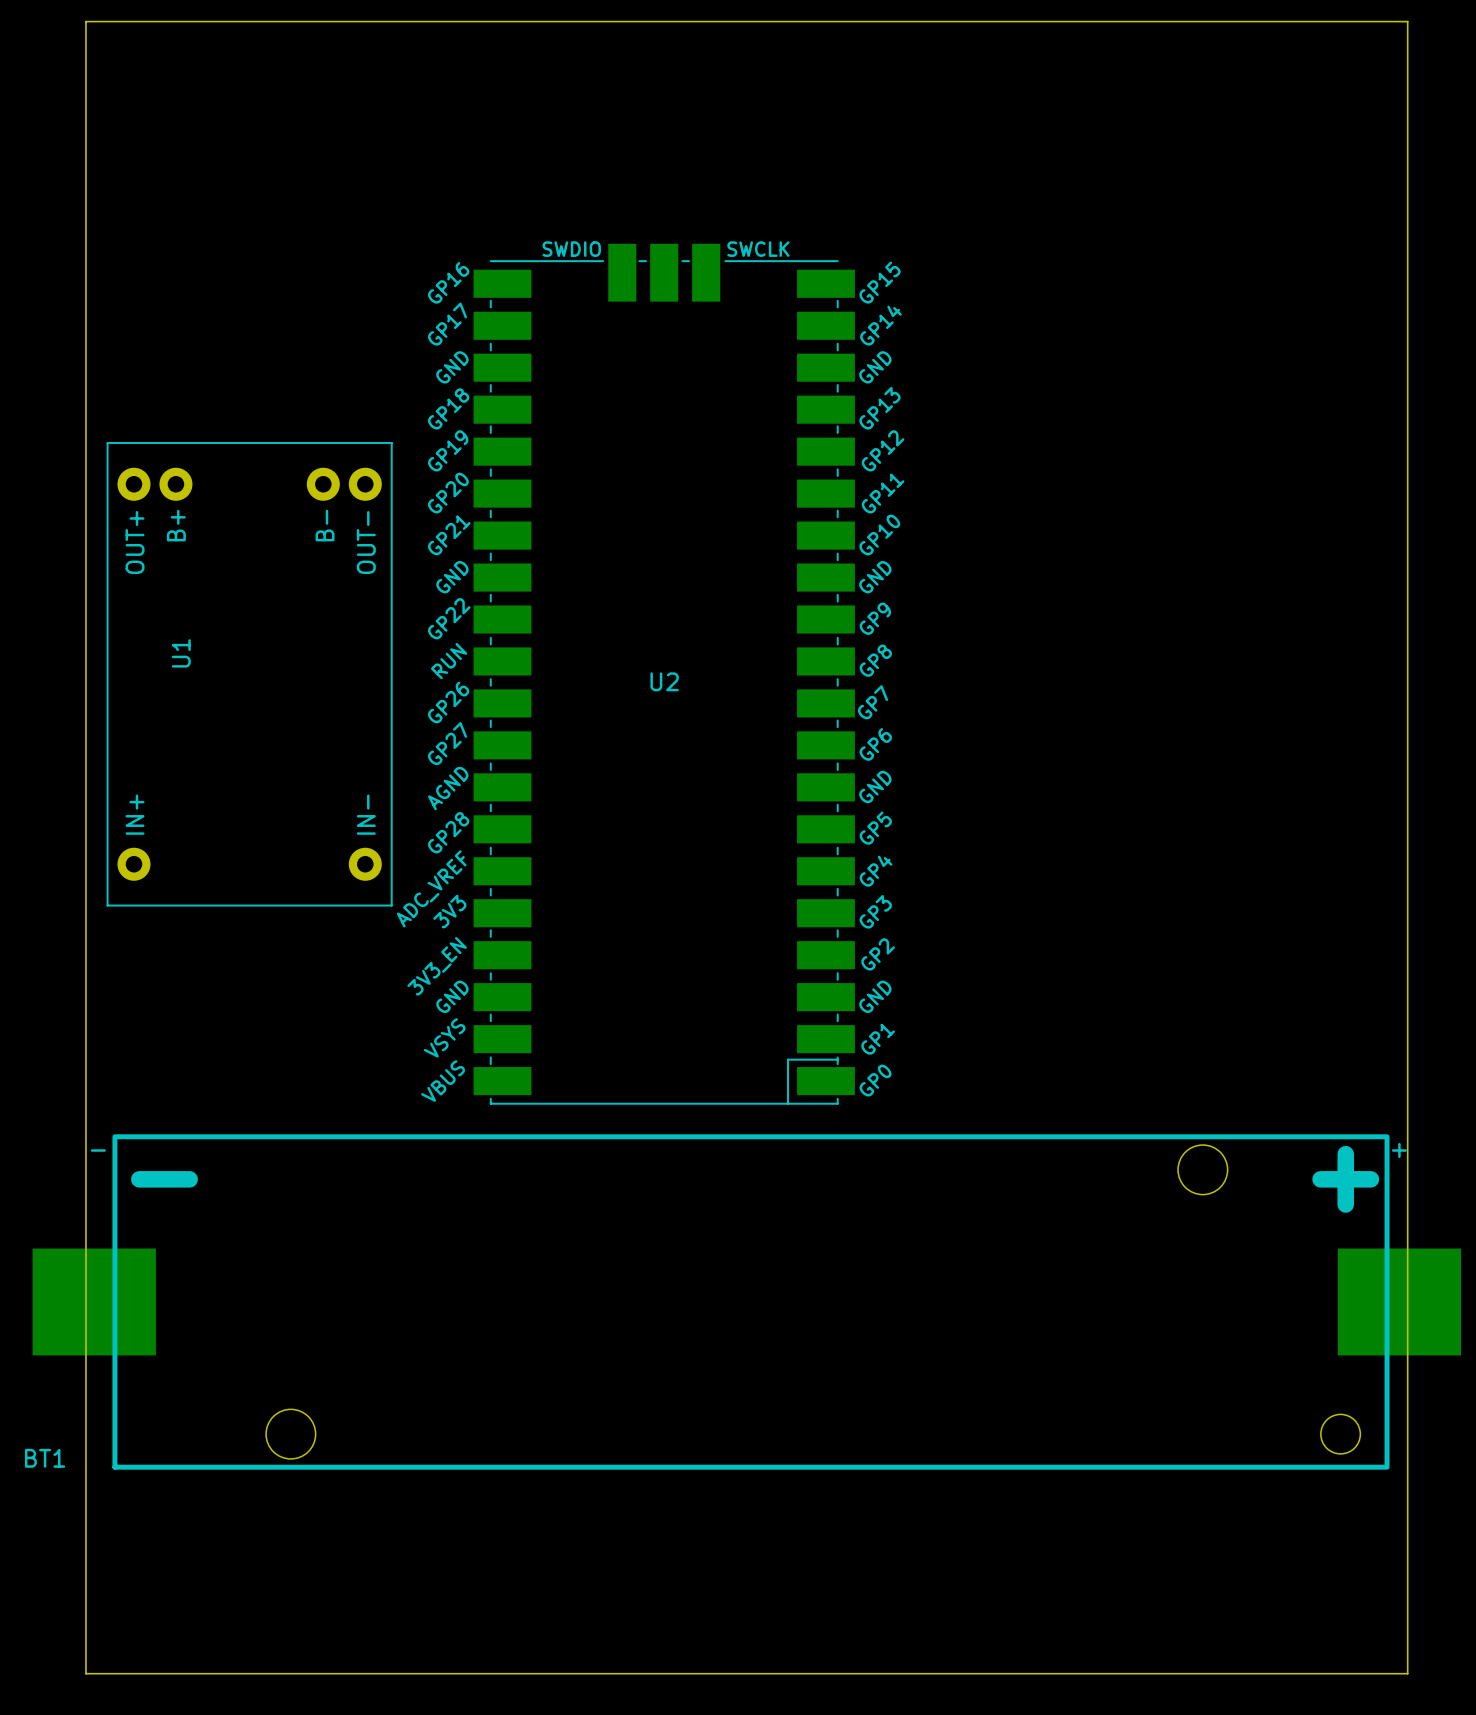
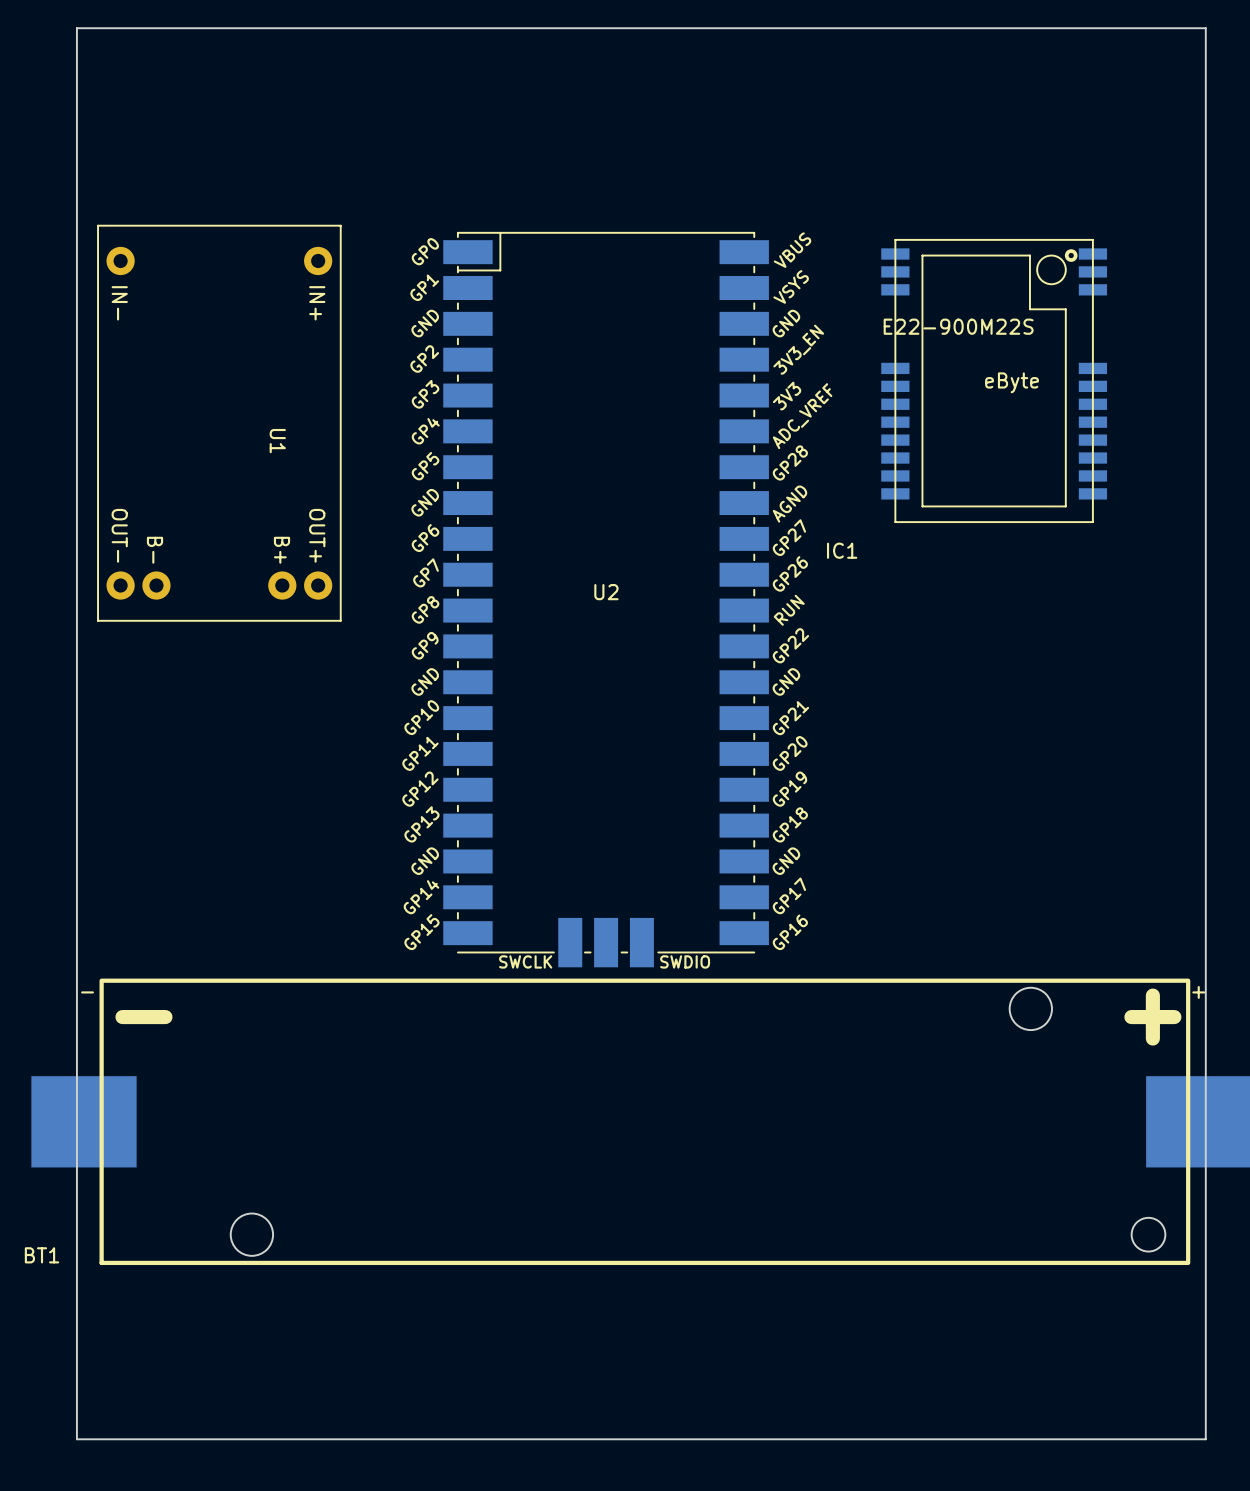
IC1: none -> (994, 380)
U1 rotation: 0° (249, 674) -> 180° (219, 423)
U2 rotation: 0° (664, 674) -> 180° (606, 599)

